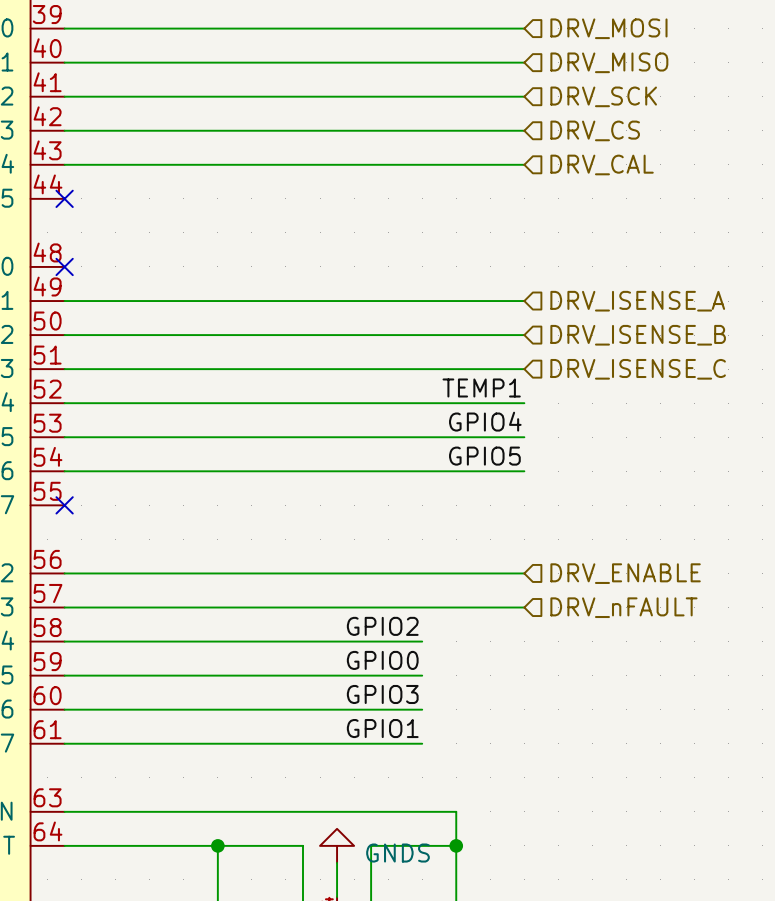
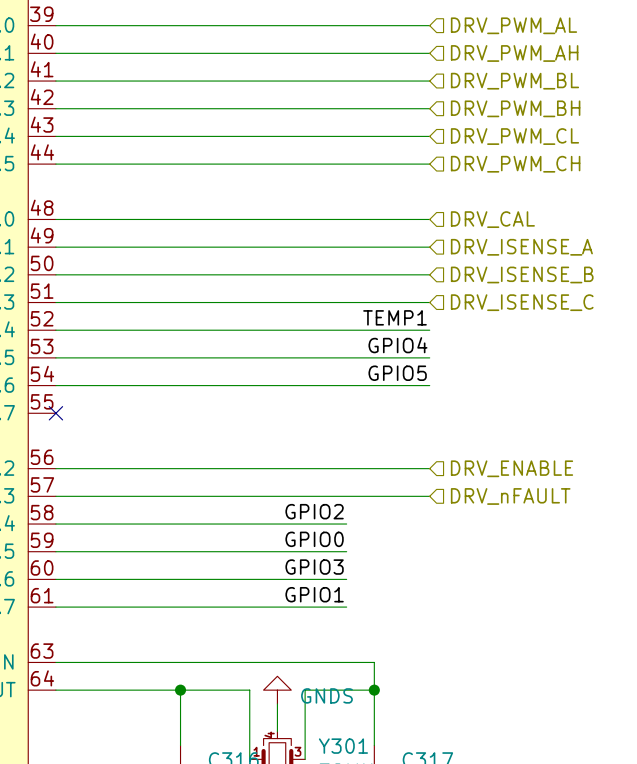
hierarchical label: DRV_MOSI (608, 28) -> DRV_PWM_AL (513, 25)
hierarchical label: DRV_MISO (609, 62) -> DRV_PWM_AH (514, 53)
hierarchical label: DRV_SCK (603, 96) -> DRV_PWM_BL (514, 81)
hierarchical label: DRV_CS (595, 130) -> DRV_PWM_BH (515, 108)
hierarchical label: DRV_CAL (602, 164) -> DRV_PWM_CL (514, 136)
wire: none -> (55, 164) (429, 164)
no-connect mark: (64, 198) -> none
hierarchical label: none -> DRV_PWM_CH (515, 164)
wire: none -> (55, 219) (429, 219)
no-connect mark: (64, 266) -> none
hierarchical label: none -> DRV_CAL (492, 219)

